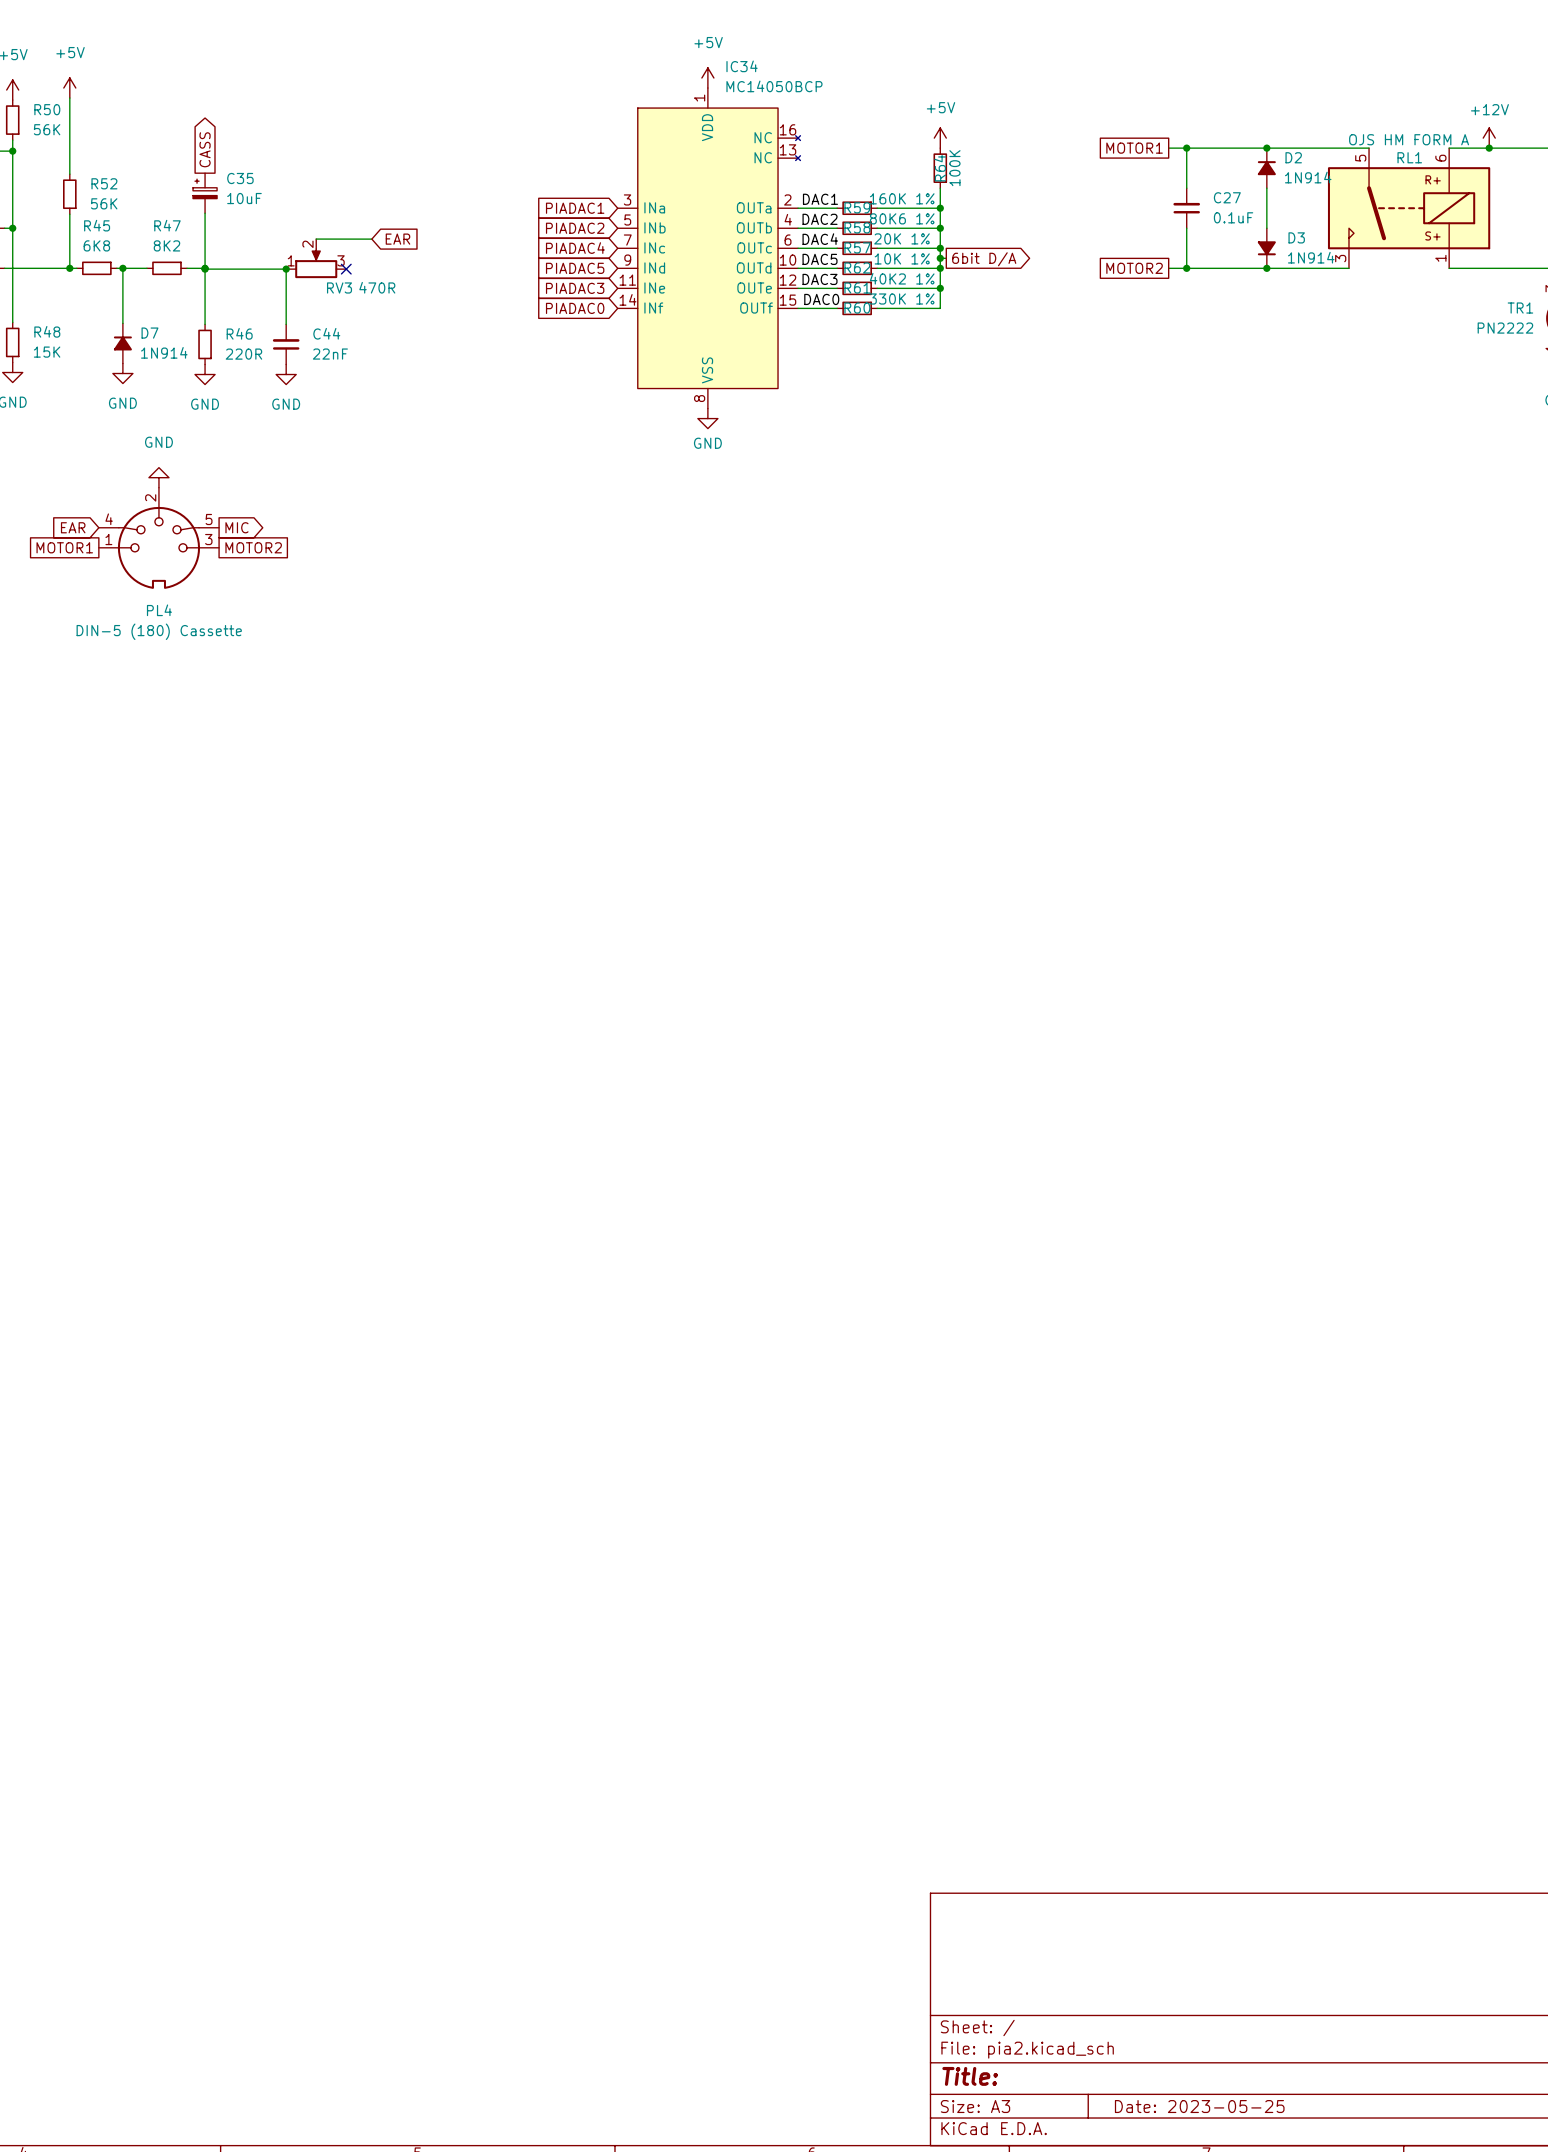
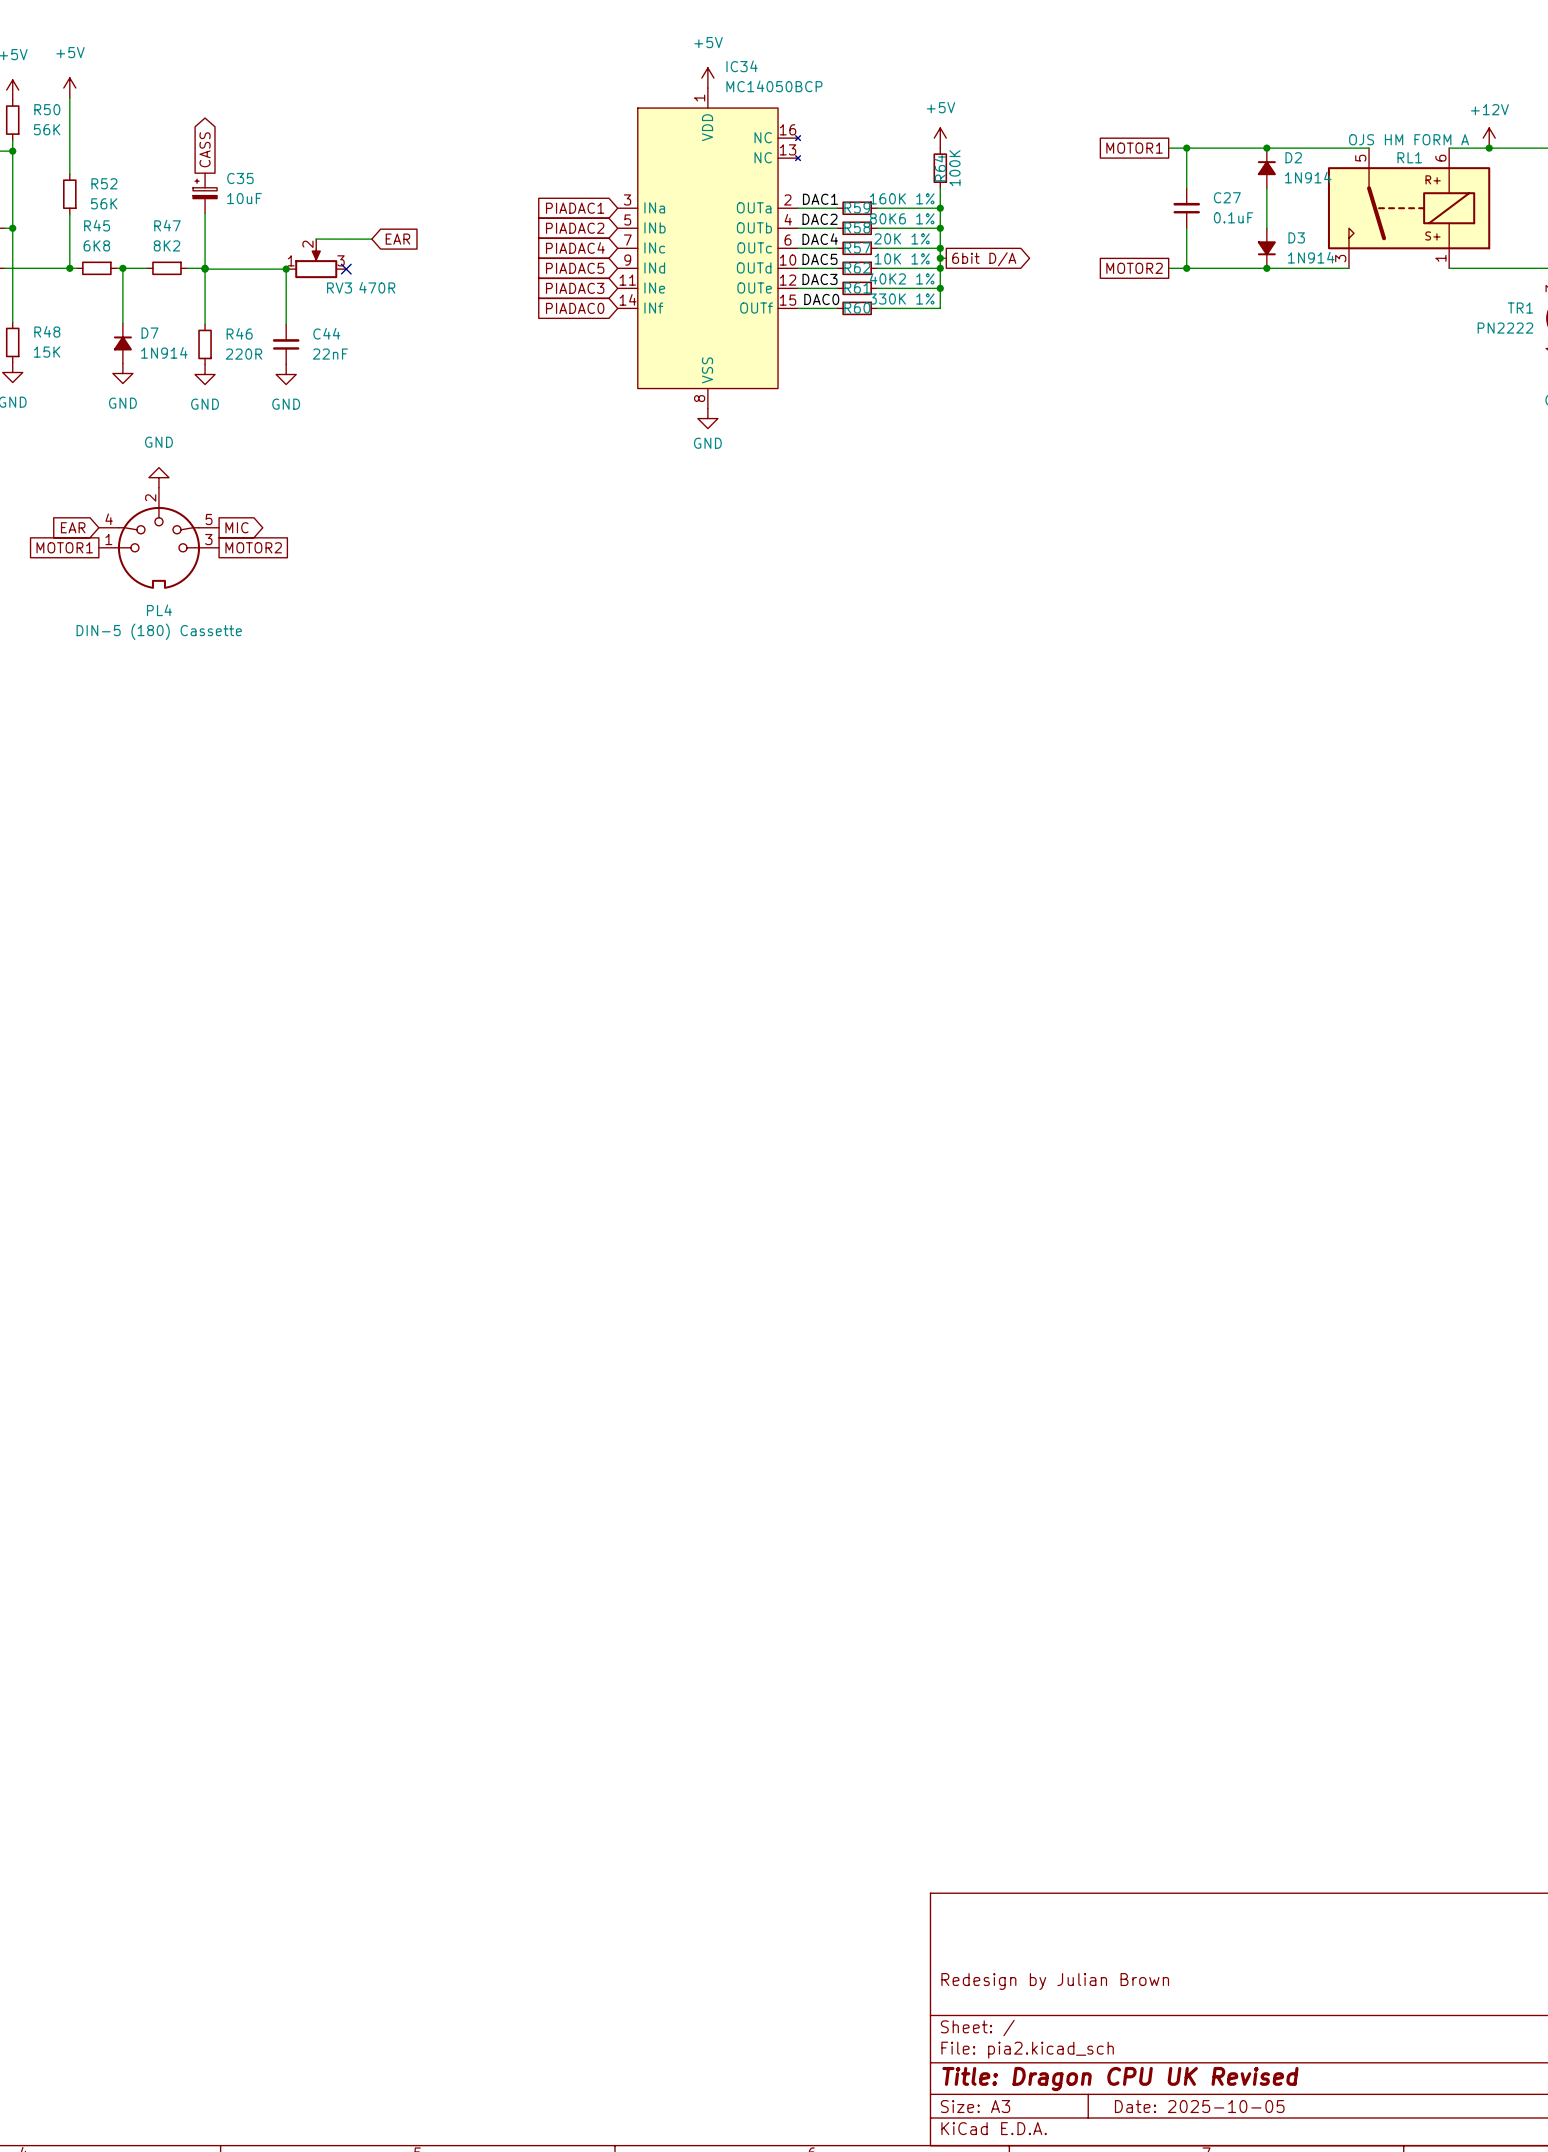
title block: none -> Redesign by Julian Brown (1055, 1981)
title block: Title: (970, 2076) -> Title: Dragon CPU UK Revised (1120, 2079)
title block: Date: 2023-05-25 (1199, 2106) -> Date: 2025-10-05 (1199, 2106)

